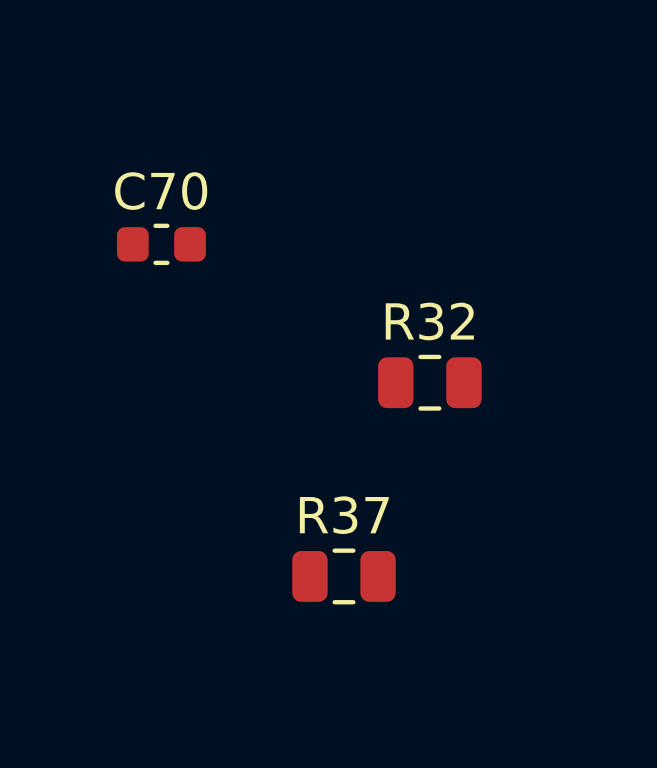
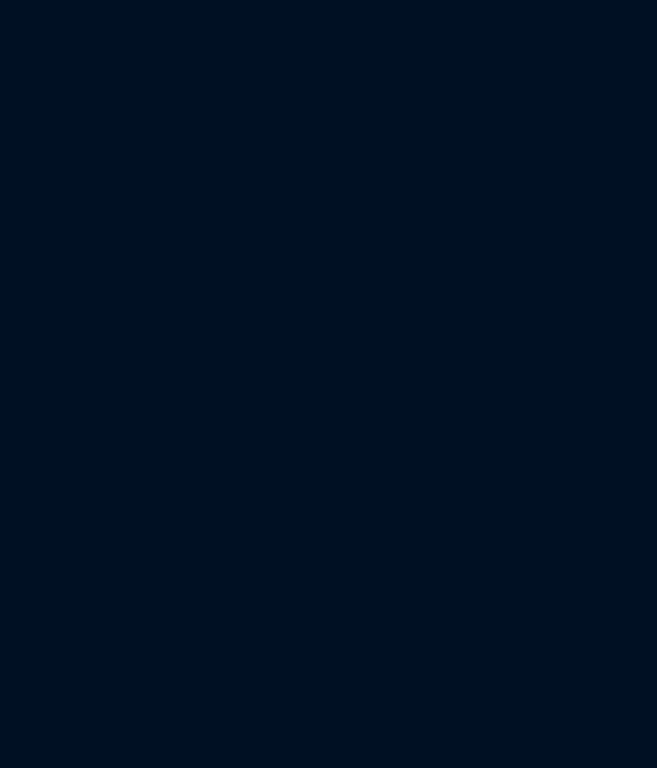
C70: (161, 244) -> none
R32: (429, 382) -> none
R37: (344, 576) -> none

